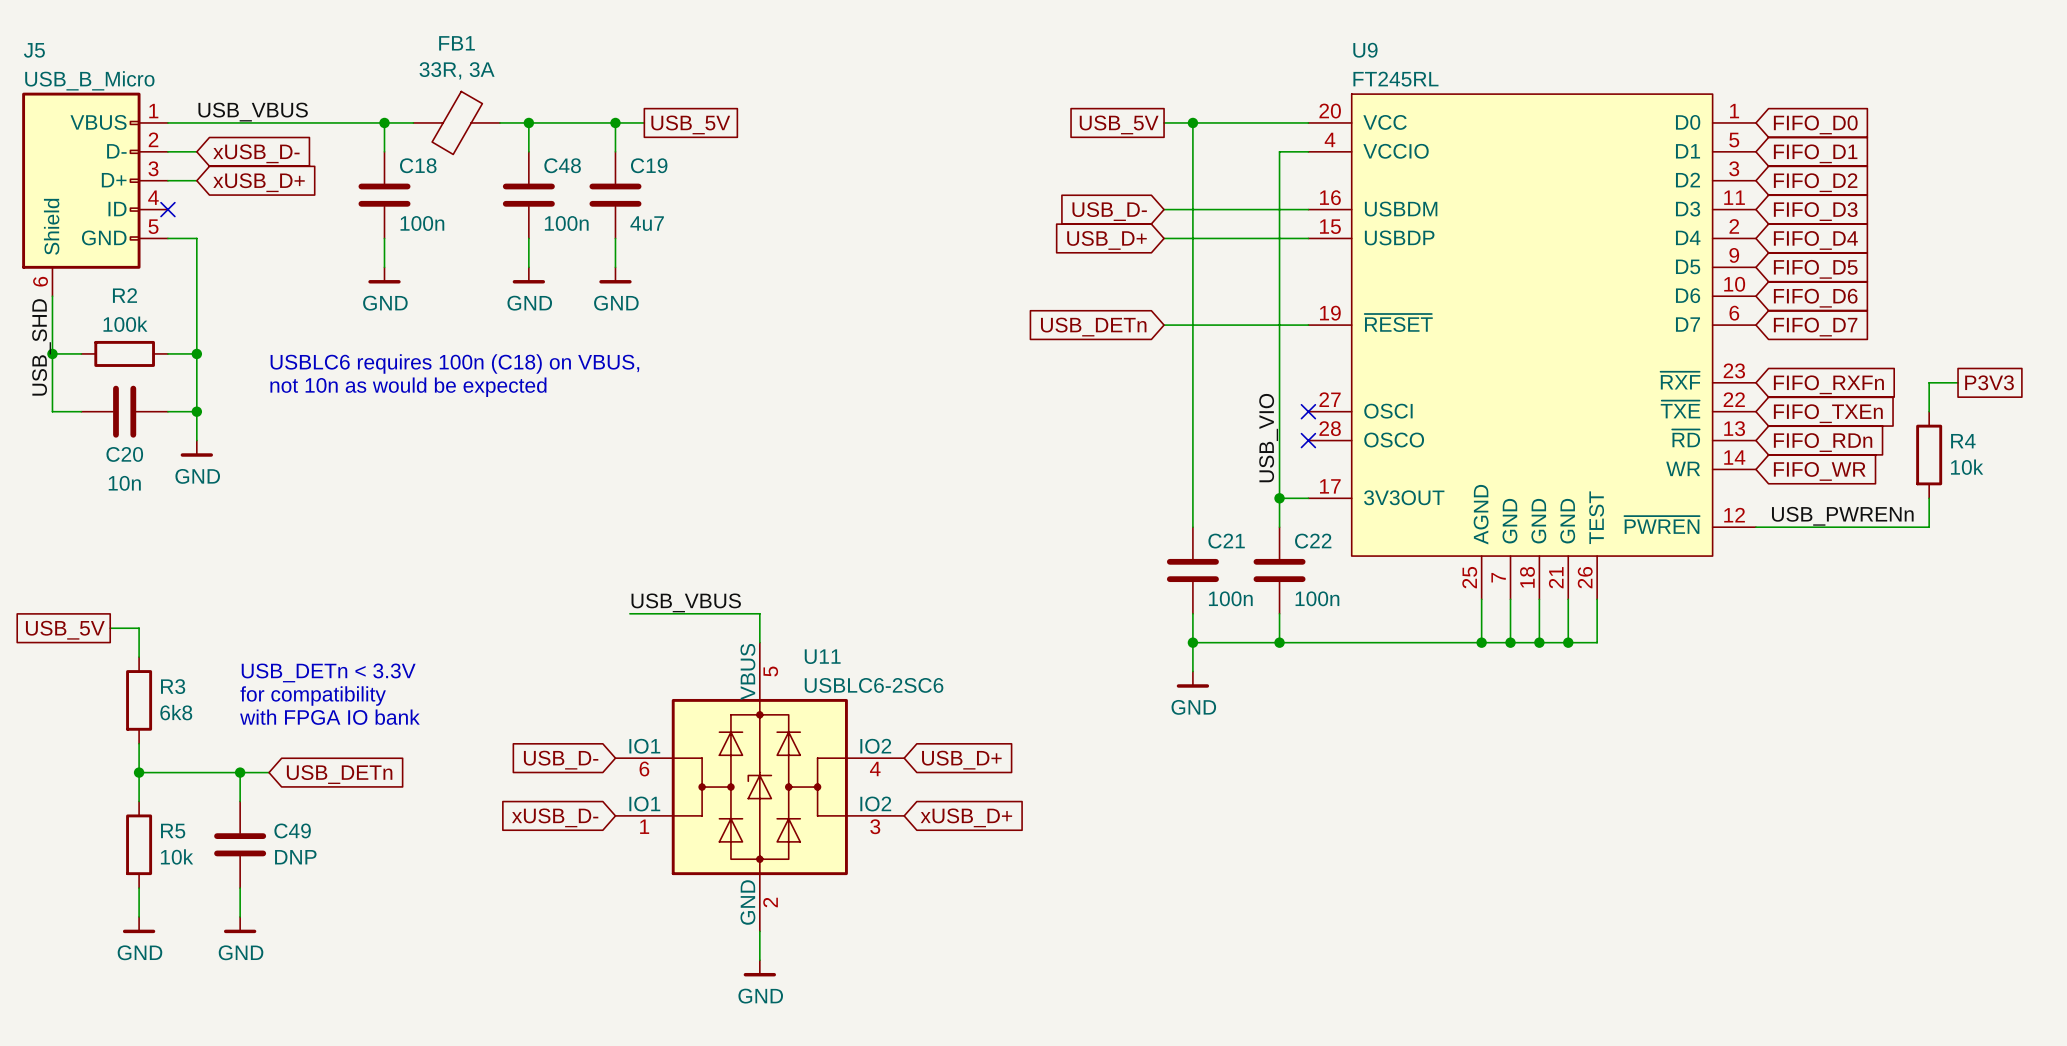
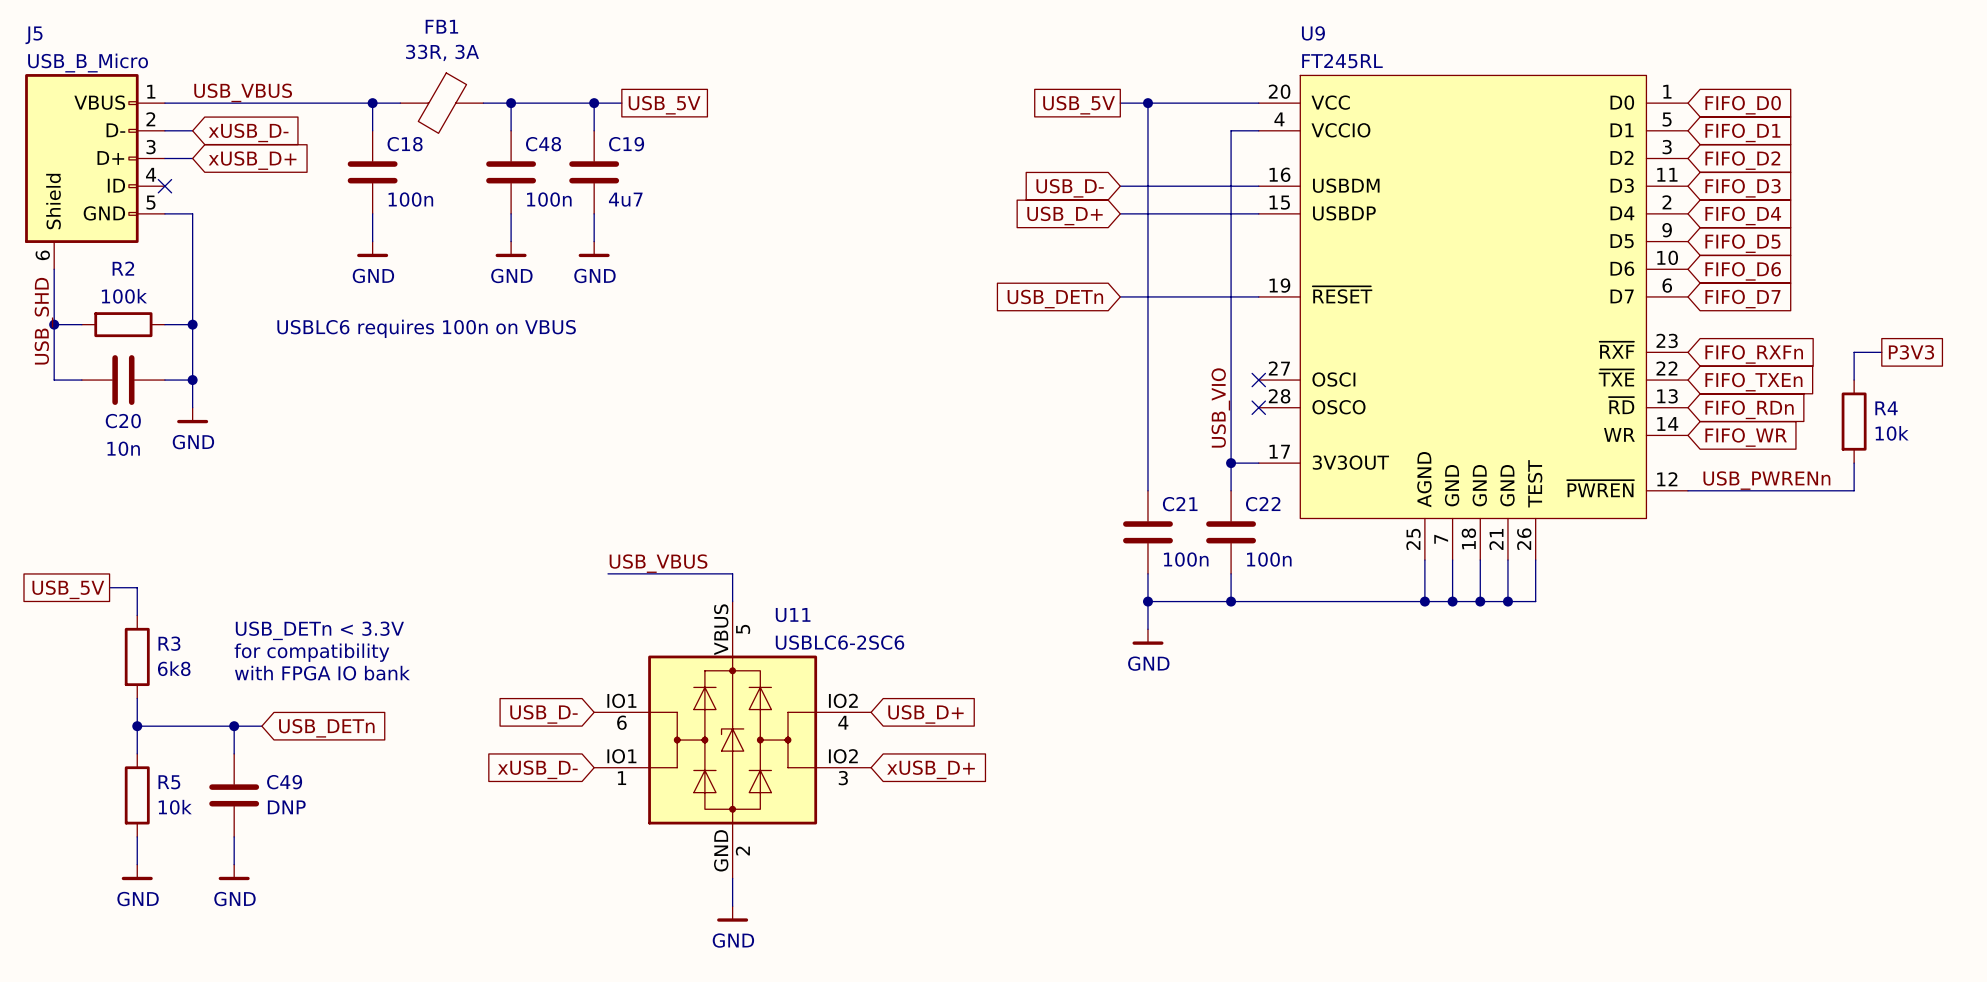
text: USBLC6 requires 100n (C18) on VBUS, (454, 363) -> USBLC6 requires 100n on VBUS (426, 328)
text: not 10n as would be expected (408, 387) -> none

